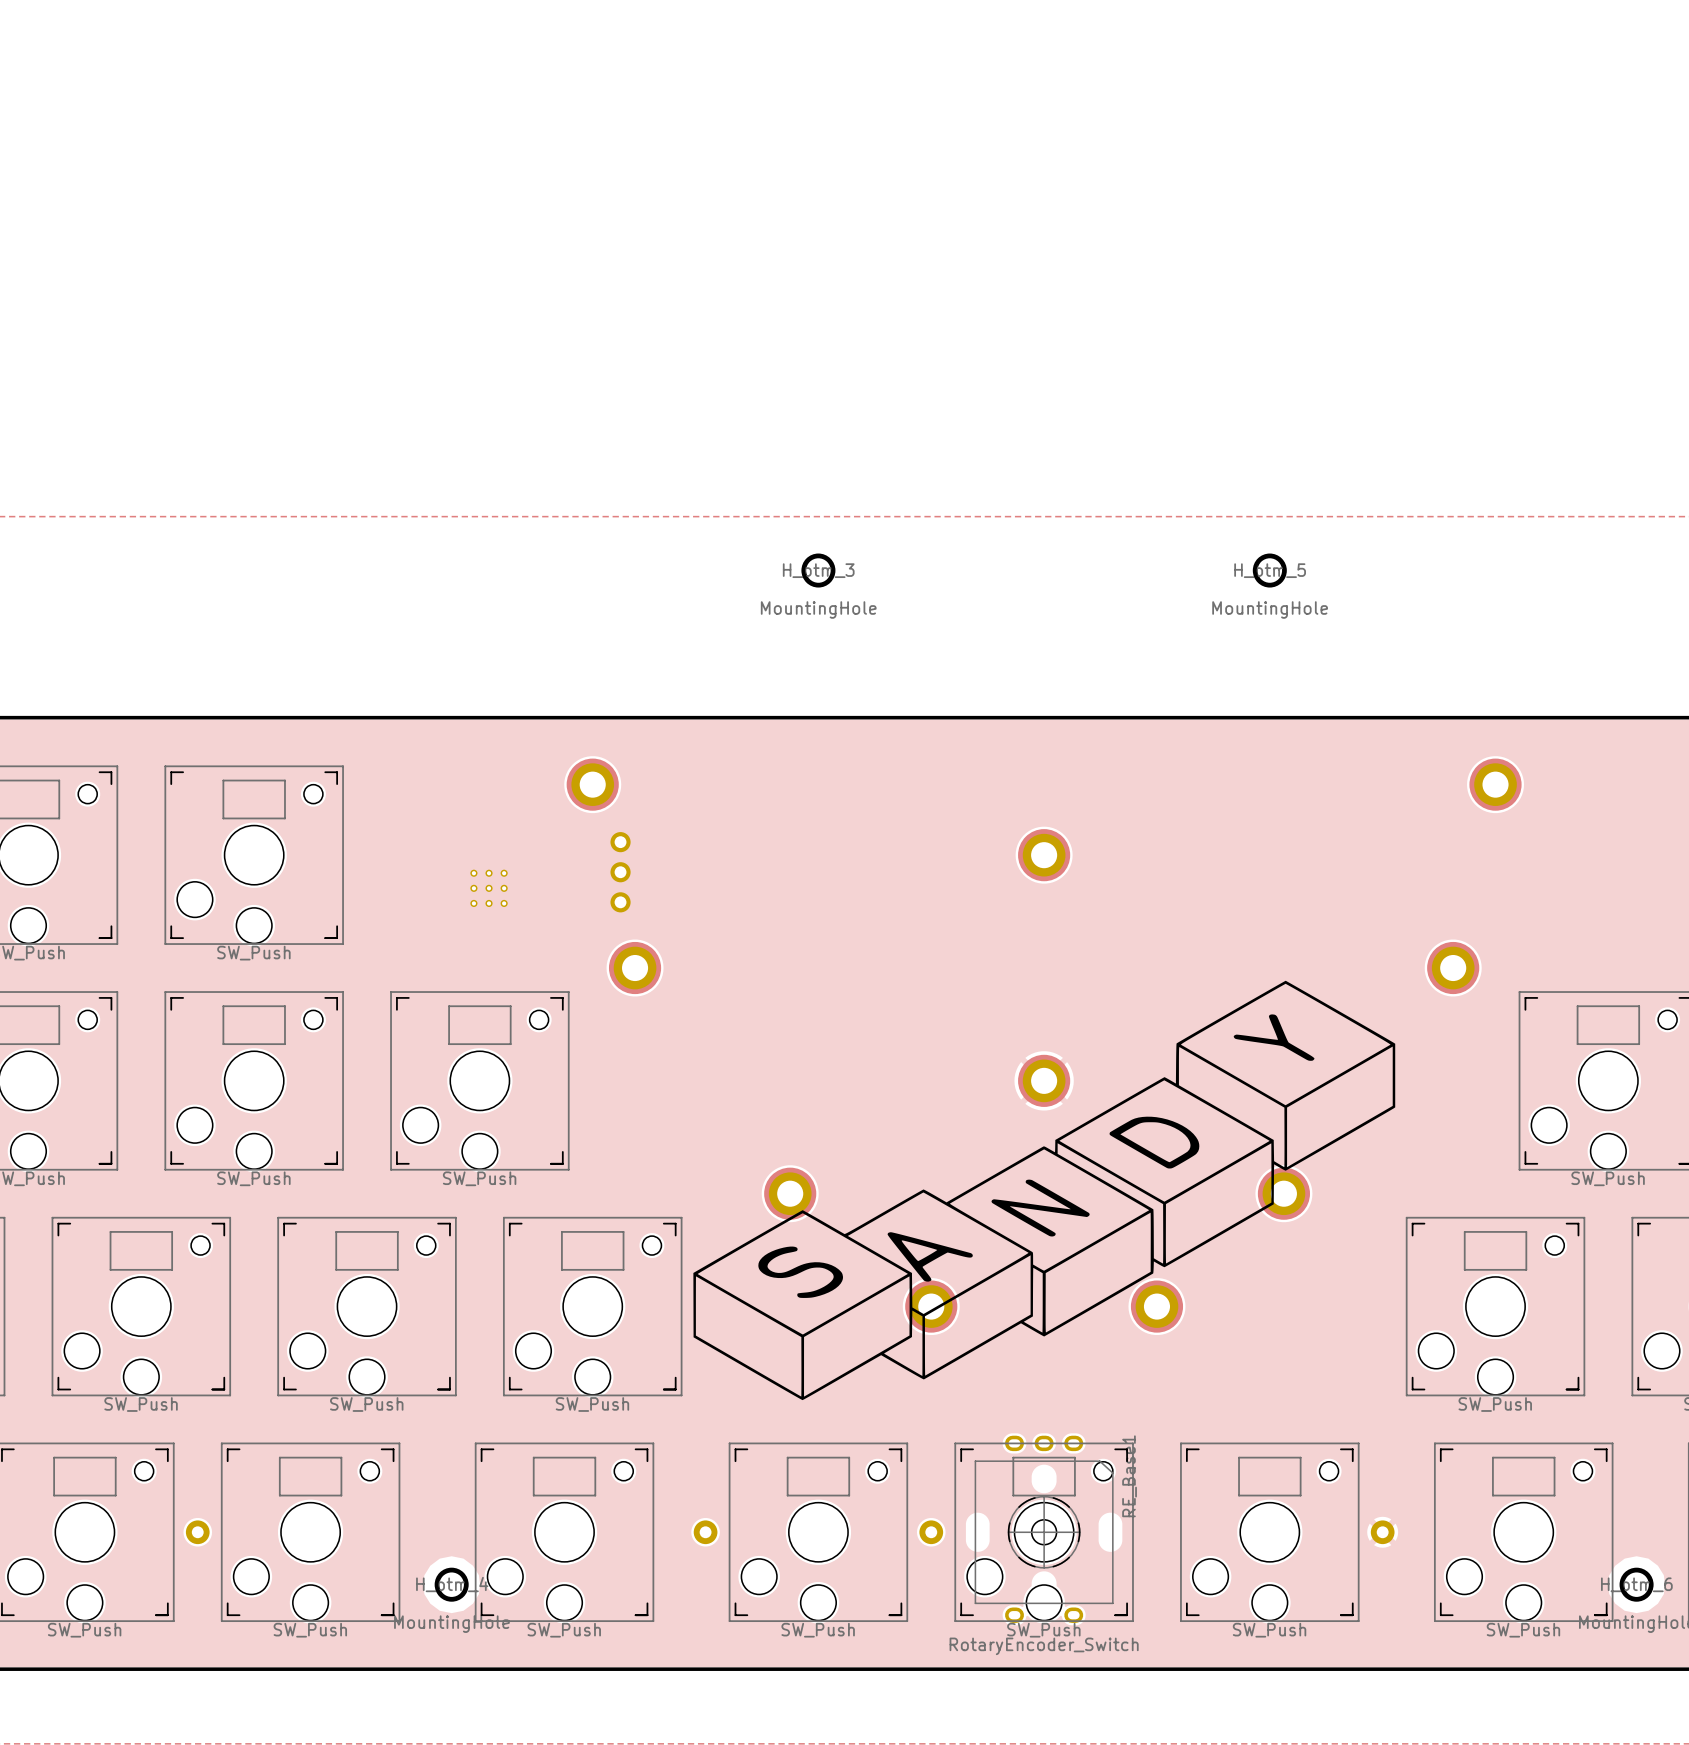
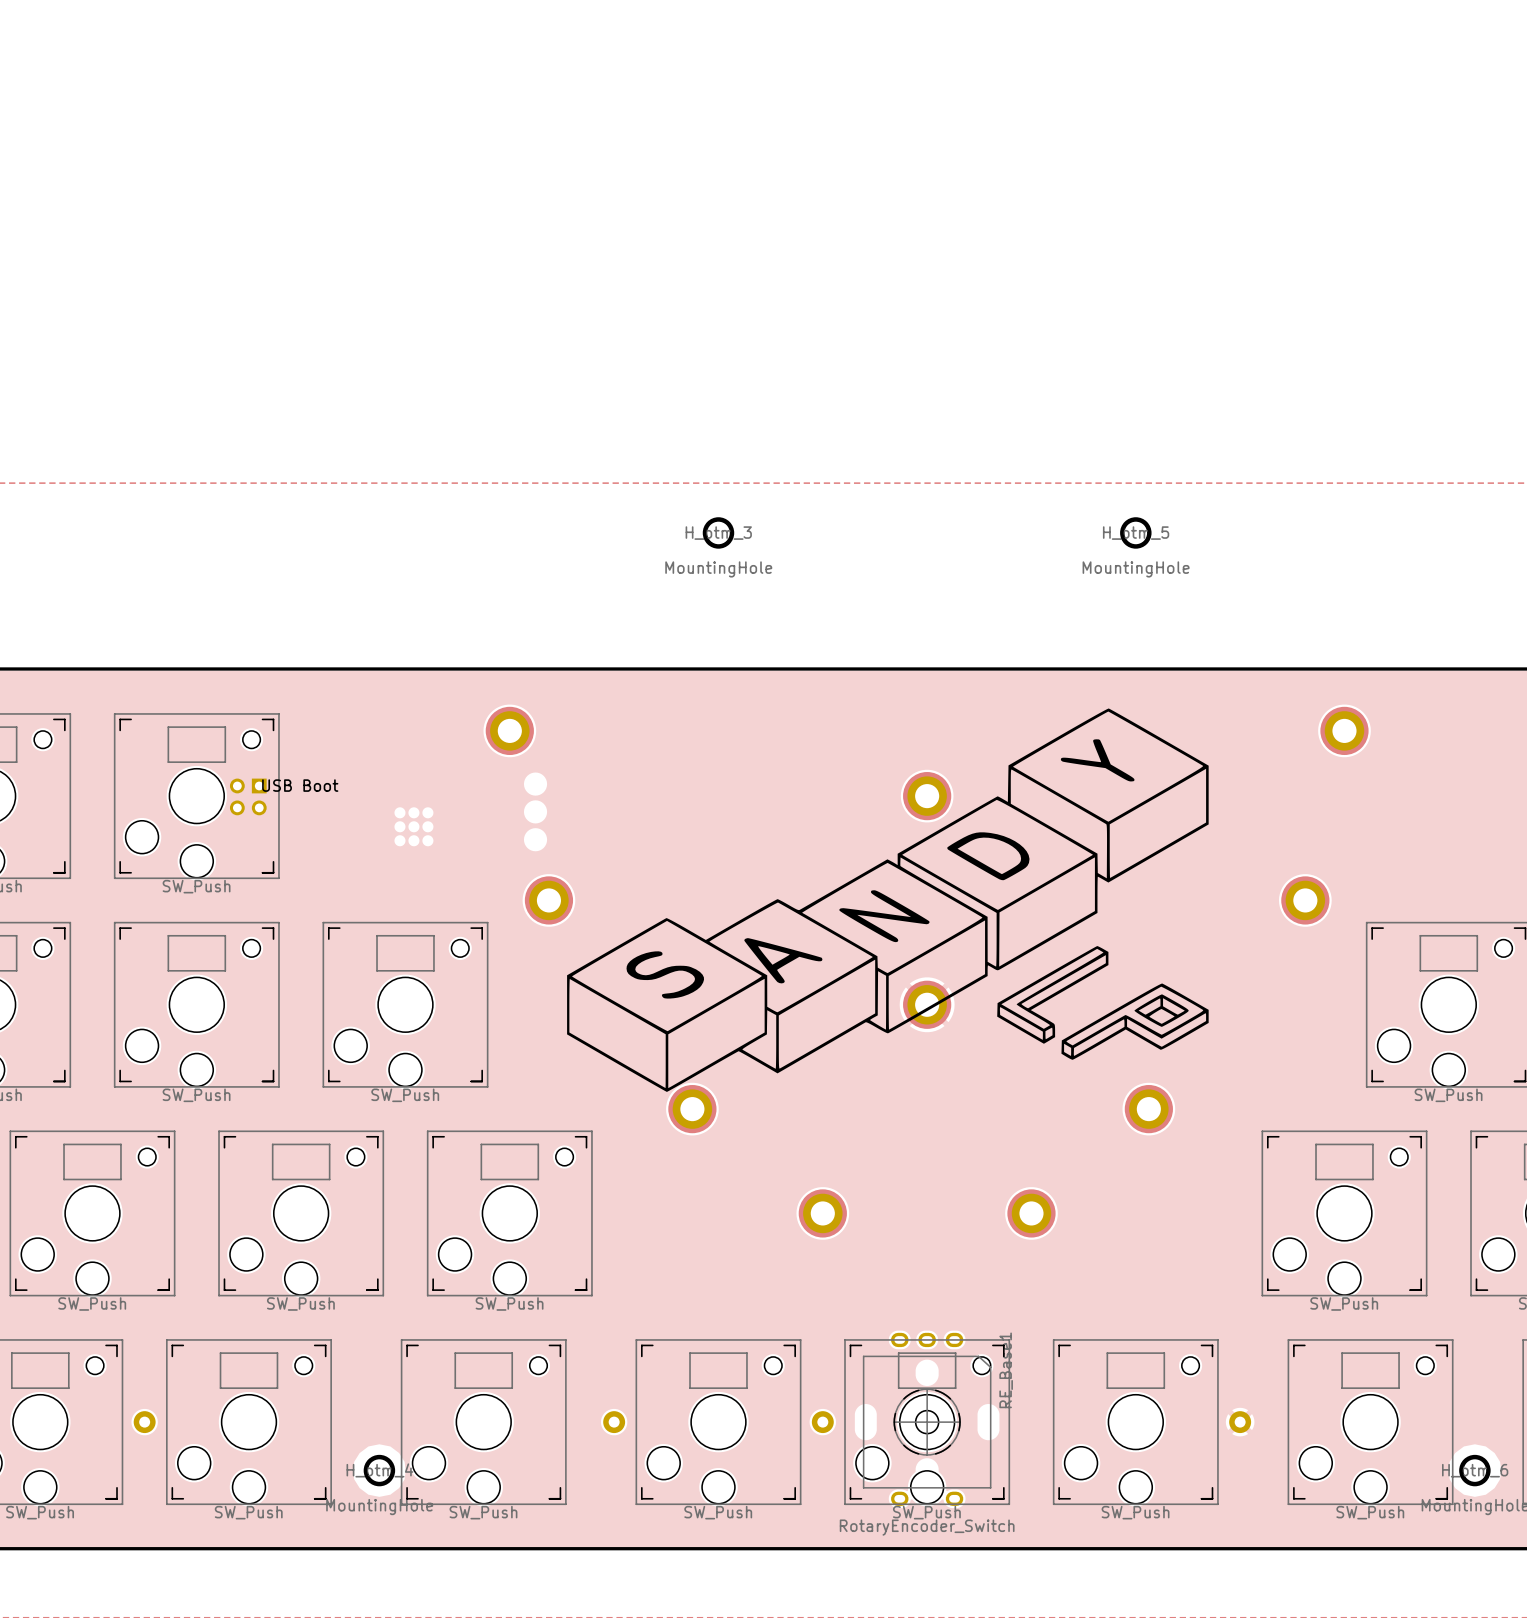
drawing: none -> [567, 708, 1209, 1092]
part: none -> (248, 796)
part: (620, 872) -> none
part: (489, 888) -> none
drawing: [693, 980, 1396, 1401] -> none

